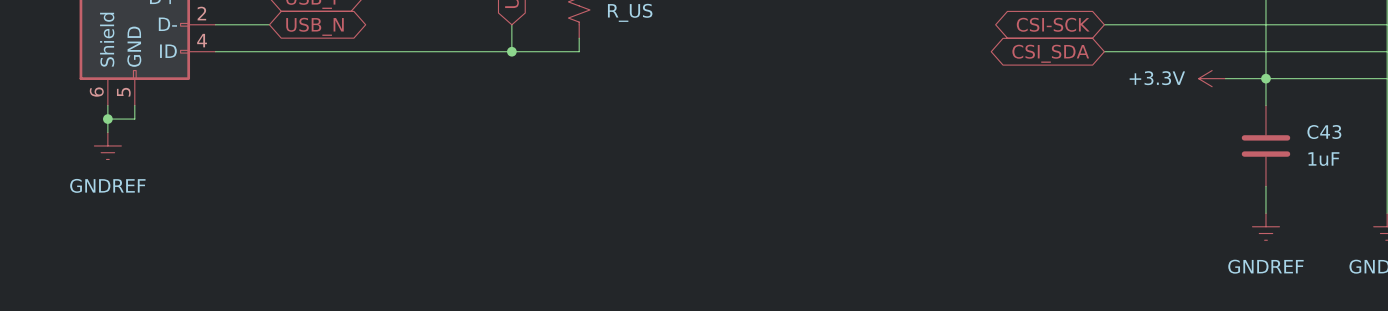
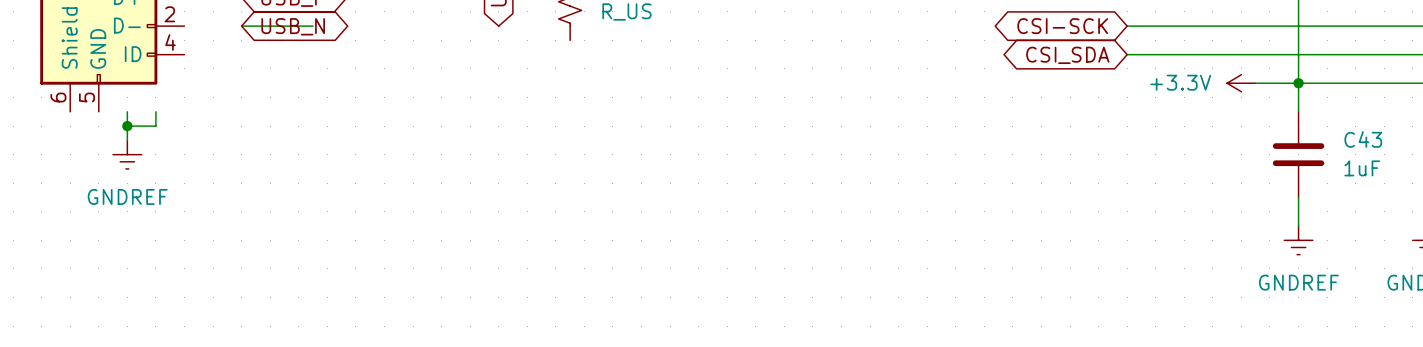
wire: (215, 24) (269, 24) -> (313, 26) (241, 26)
wire: (511, 24) (511, 51) -> none
wire: (579, 38) (579, 51) (215, 51) -> none
junction: (511, 51) -> none
wire: (107, 105) (107, 132) -> (127, 111) (127, 140)
wire: (134, 105) (134, 119) (107, 119) -> (155, 111) (155, 126) (127, 126)
junction position: (107, 119) -> (127, 126)
power symbol position: GNDREF (107, 145) -> GNDREF (127, 154)

